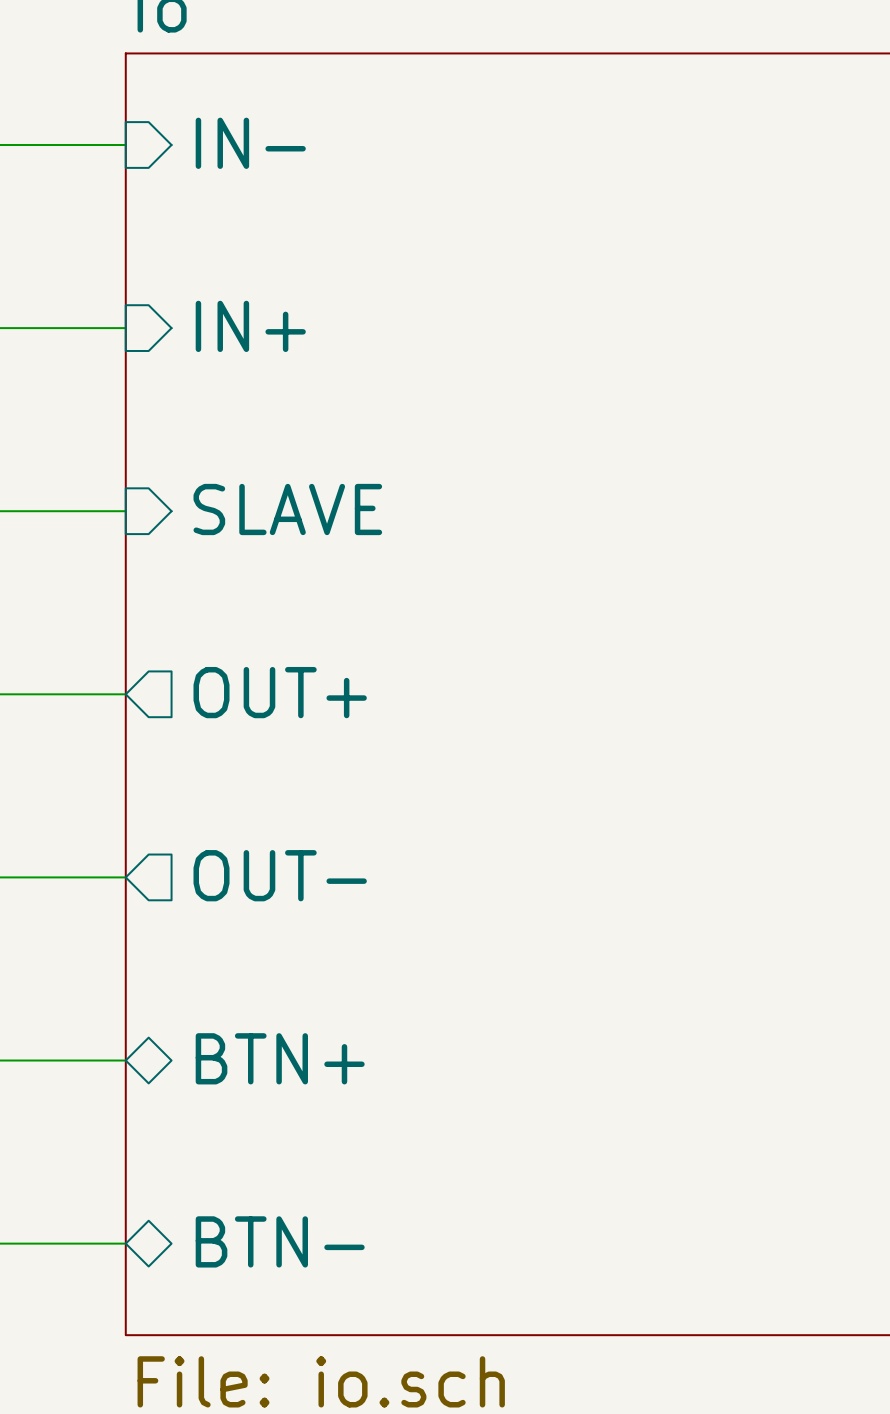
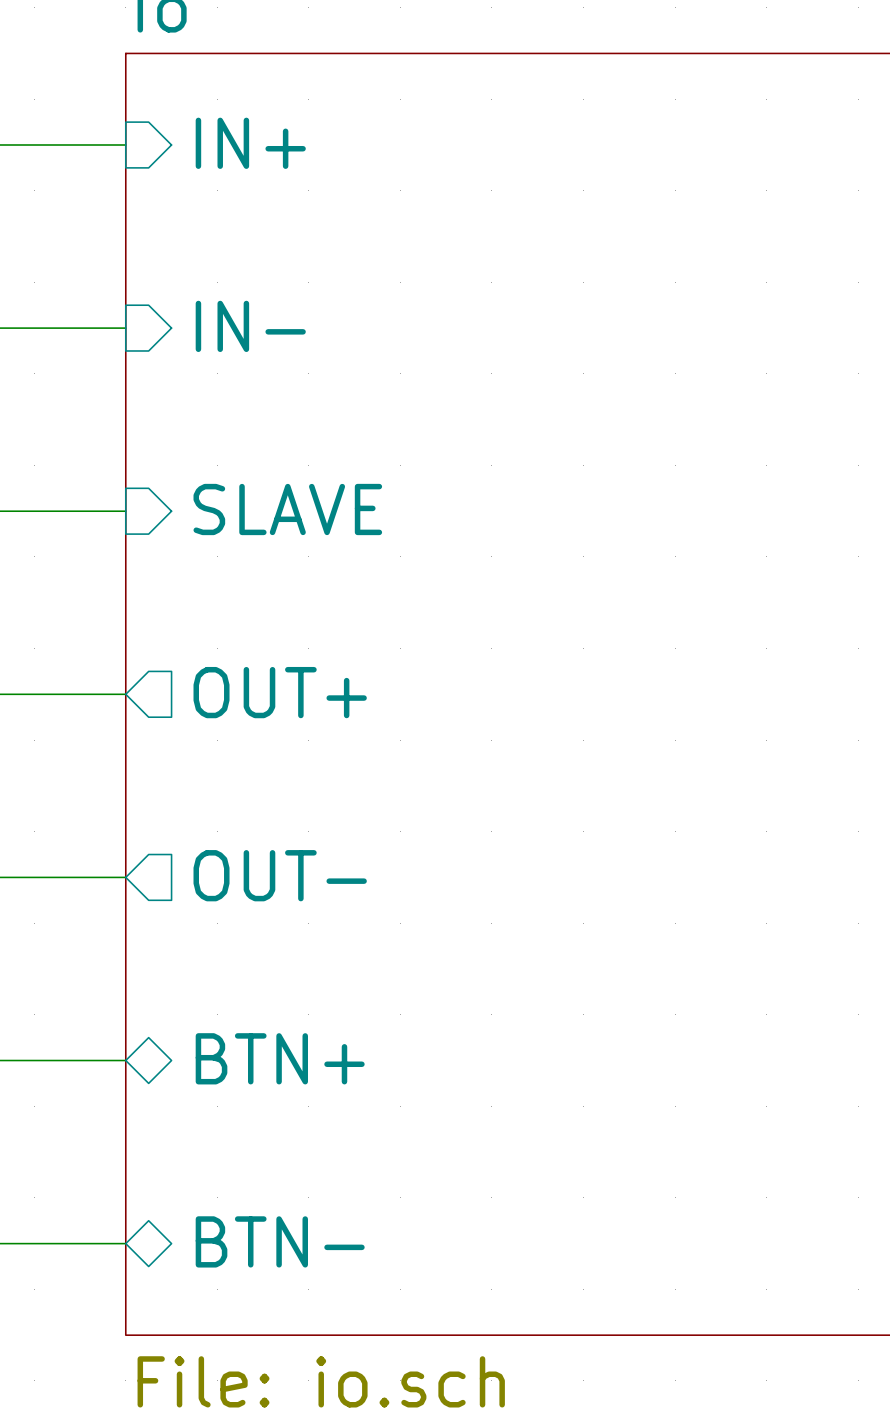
sheet pin: IN- (250, 143) -> IN+ (250, 143)
sheet pin: IN+ (250, 326) -> IN- (250, 326)

